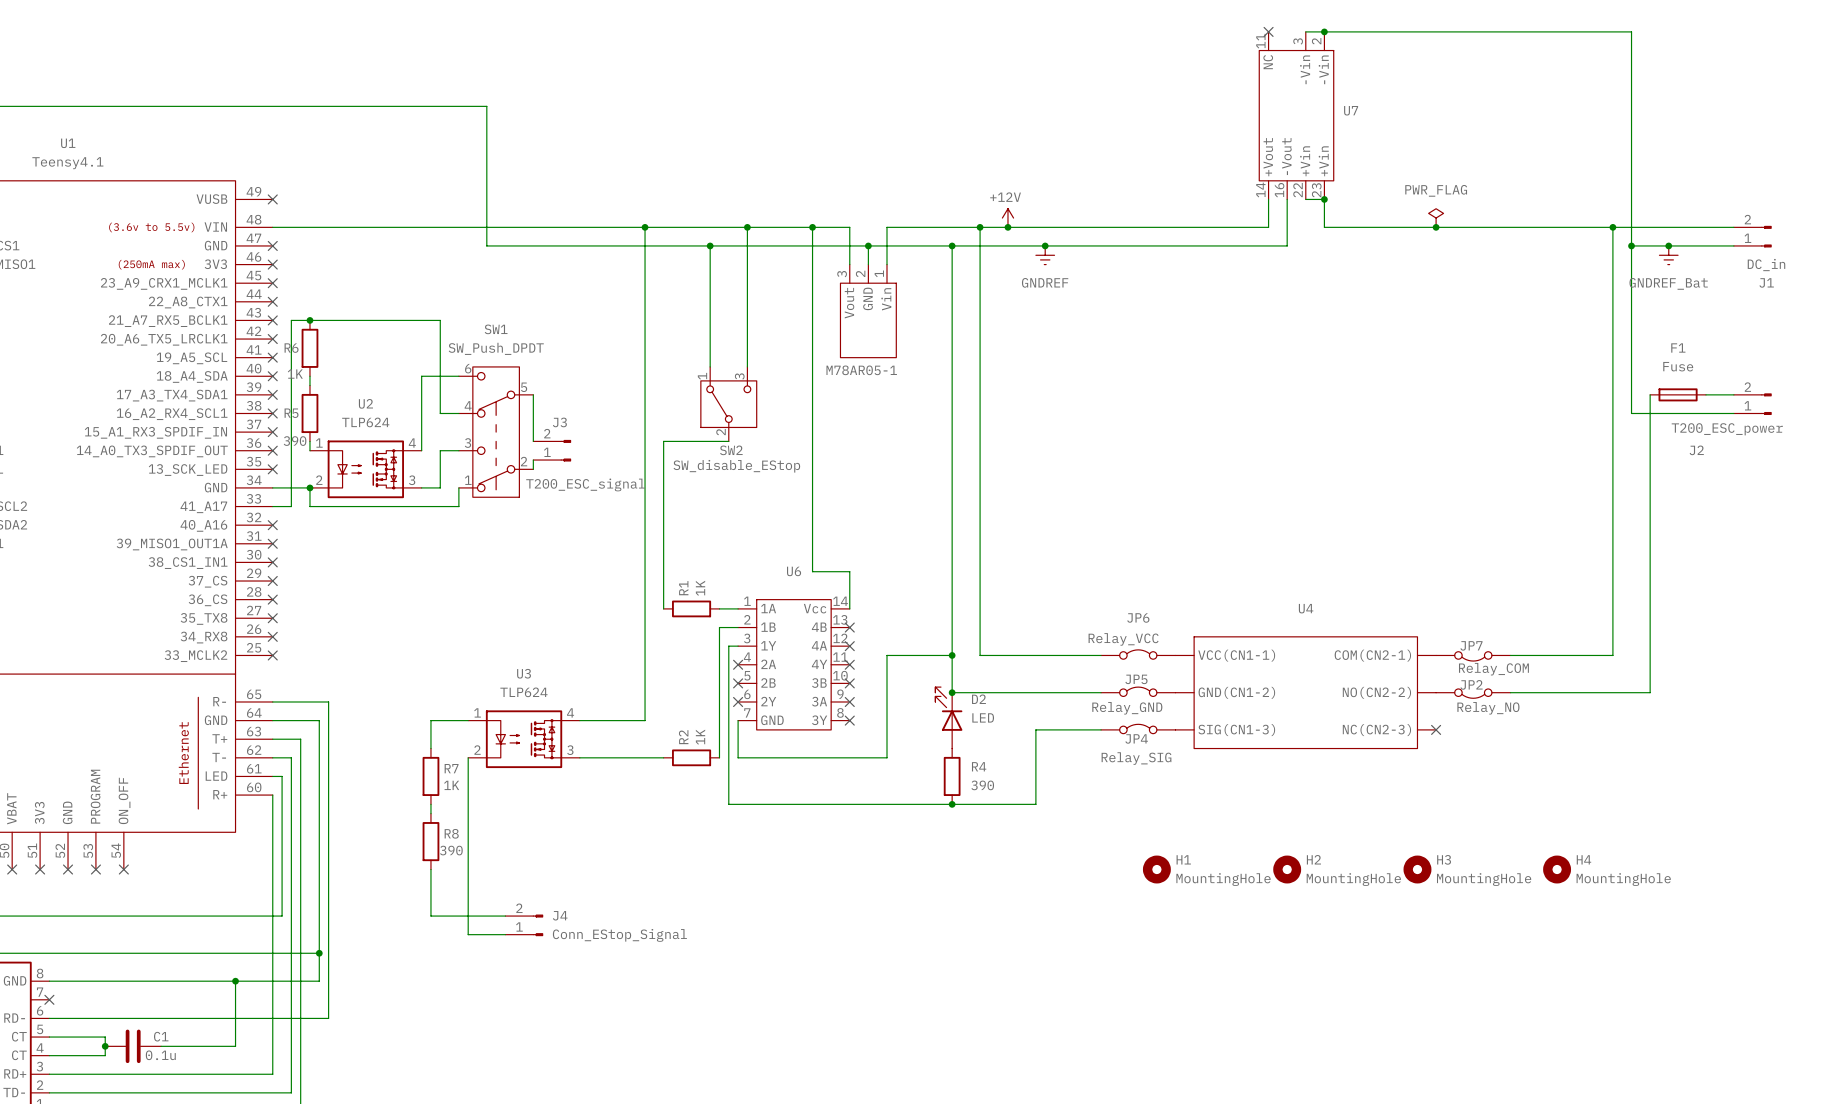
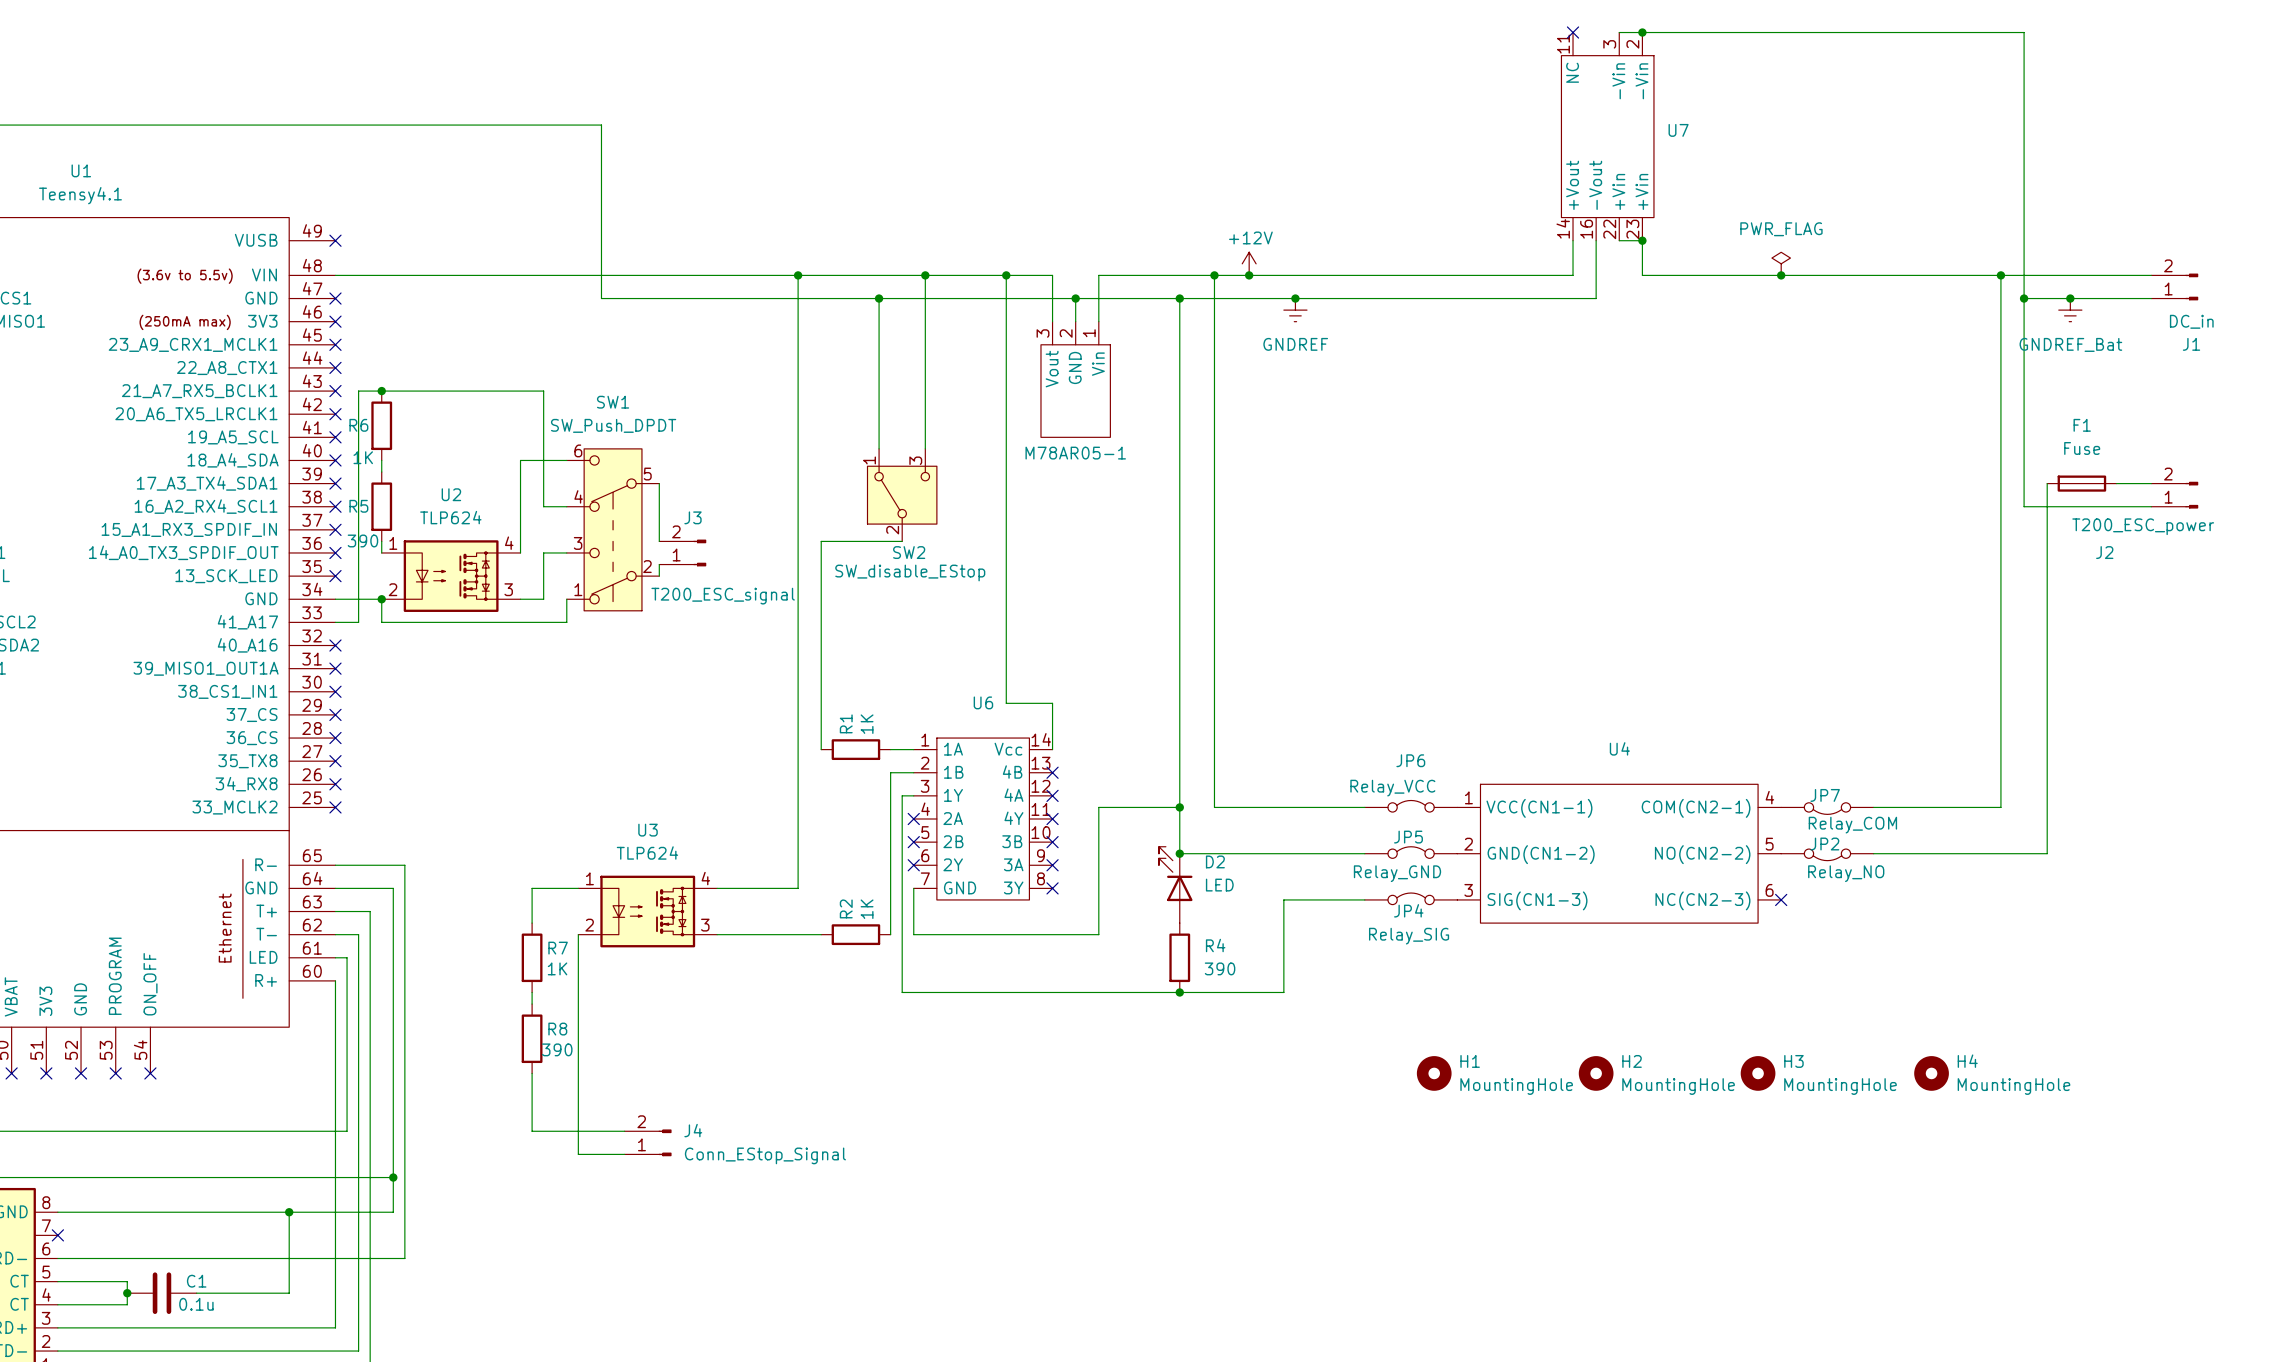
U4 pin number: none -> 1 (1468, 797)
U4 pin number: none -> 4 (1769, 797)
U4 pin number: none -> 2 (1468, 844)
U4 pin number: none -> 5 (1769, 844)
U4 pin number: none -> 3 (1468, 890)
U4 pin number: none -> 6 (1769, 890)

